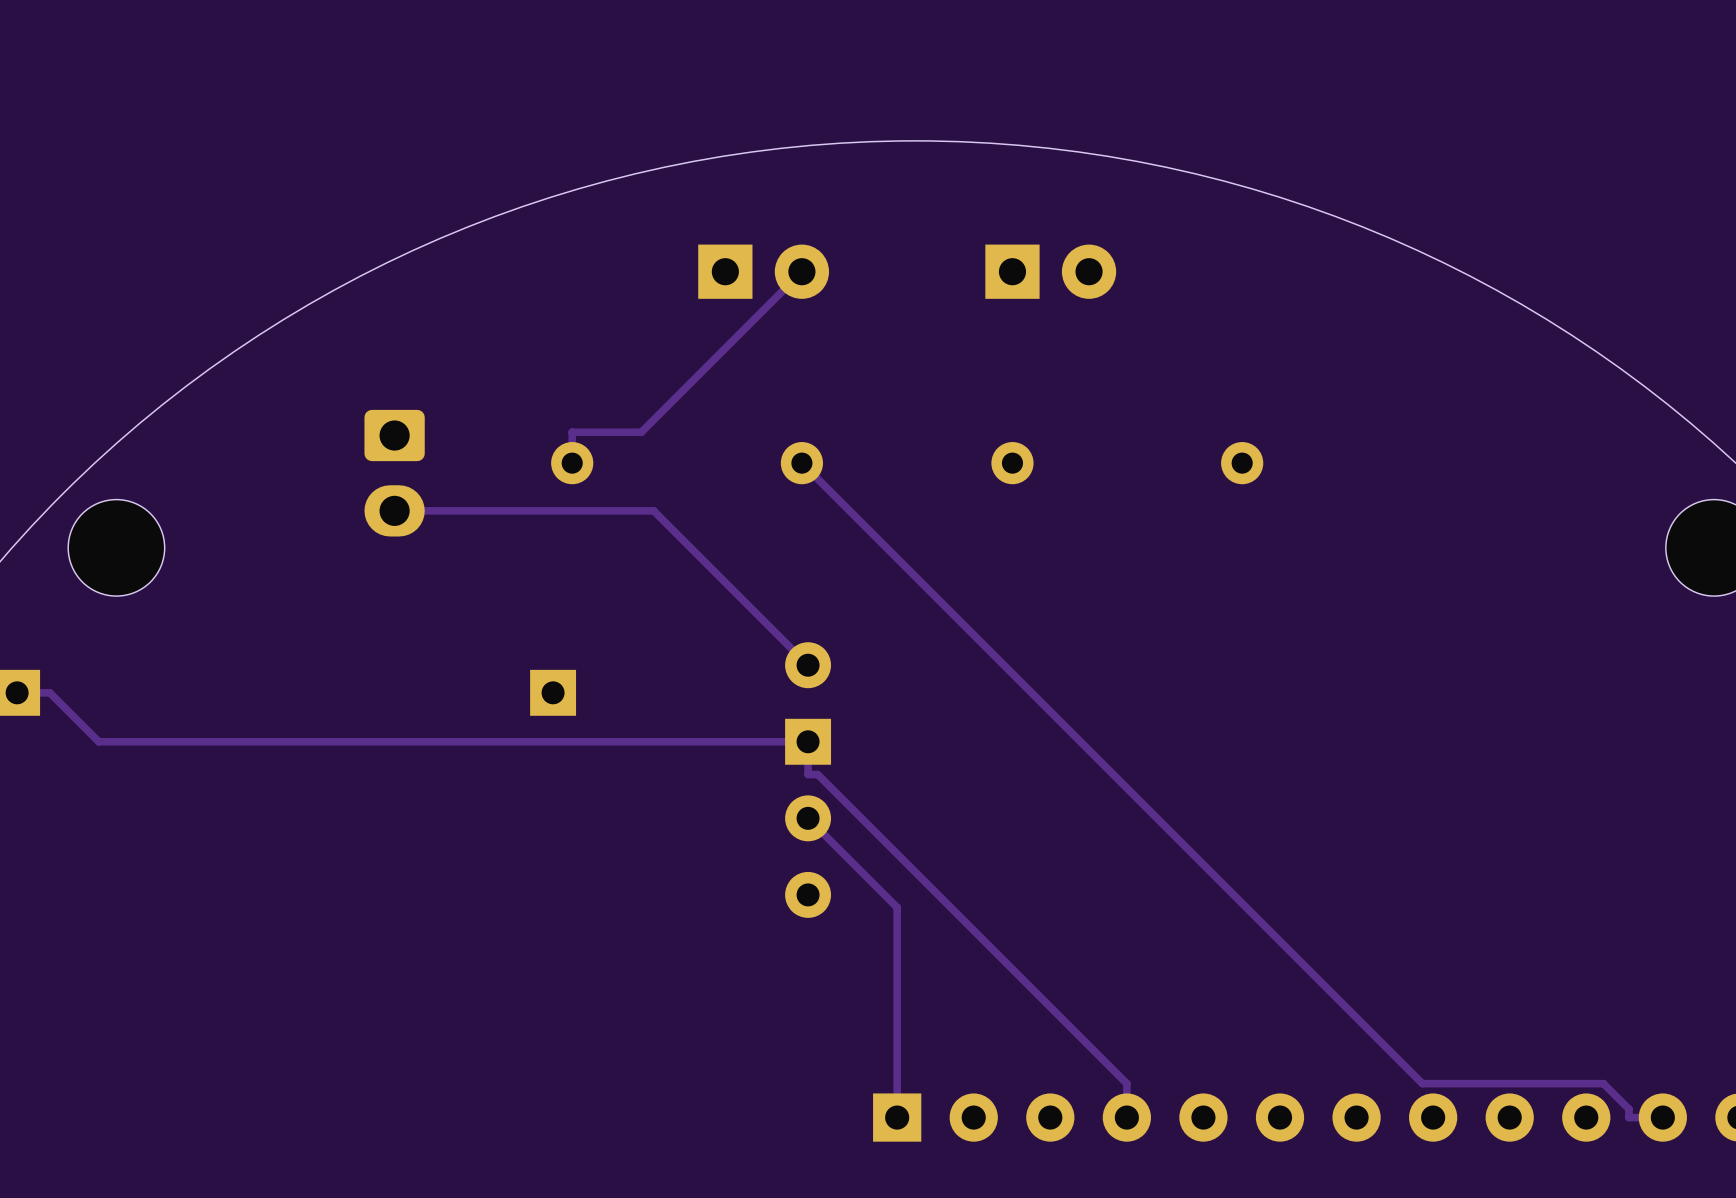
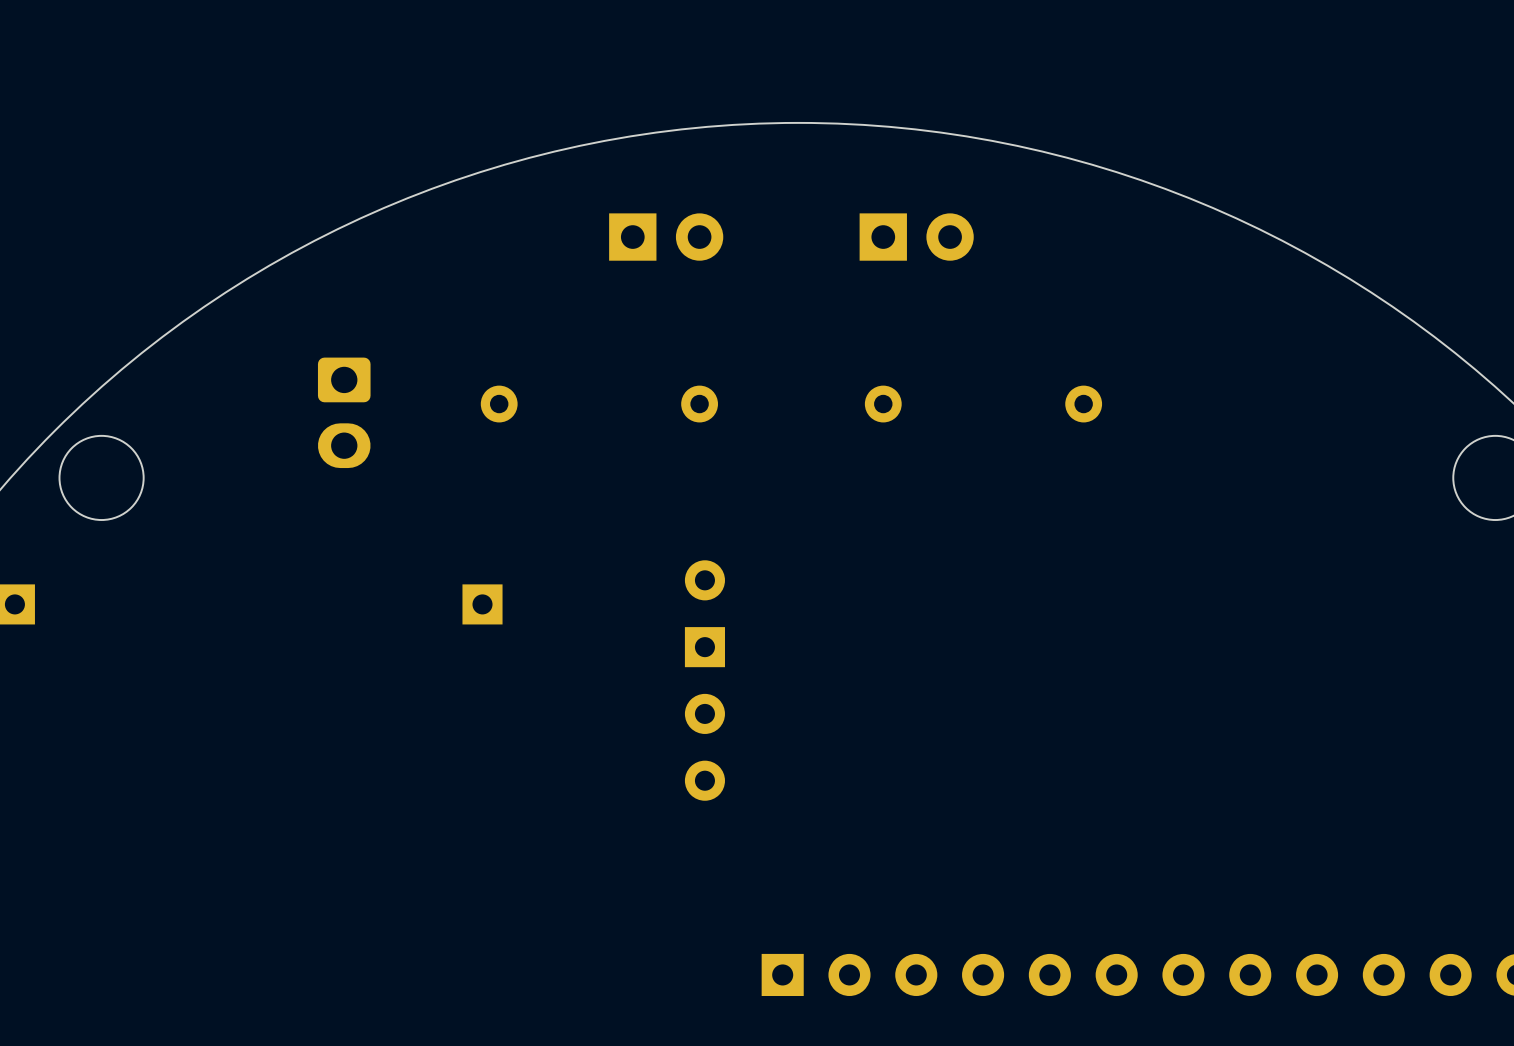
track: (801, 271) (641, 432) (572, 432) (572, 463) -> none
track: (801, 463) (1422, 1083) (1603, 1083) (1628, 1109) (1628, 1117) (1662, 1117) -> none
track: (394, 510) (653, 510) (808, 665) -> none
track: (17, 692) (49, 692) (98, 741) (808, 741) (808, 774) (817, 774) (1126, 1083) (1126, 1117) -> none
track: (808, 818) (897, 907) (897, 1117) -> none

